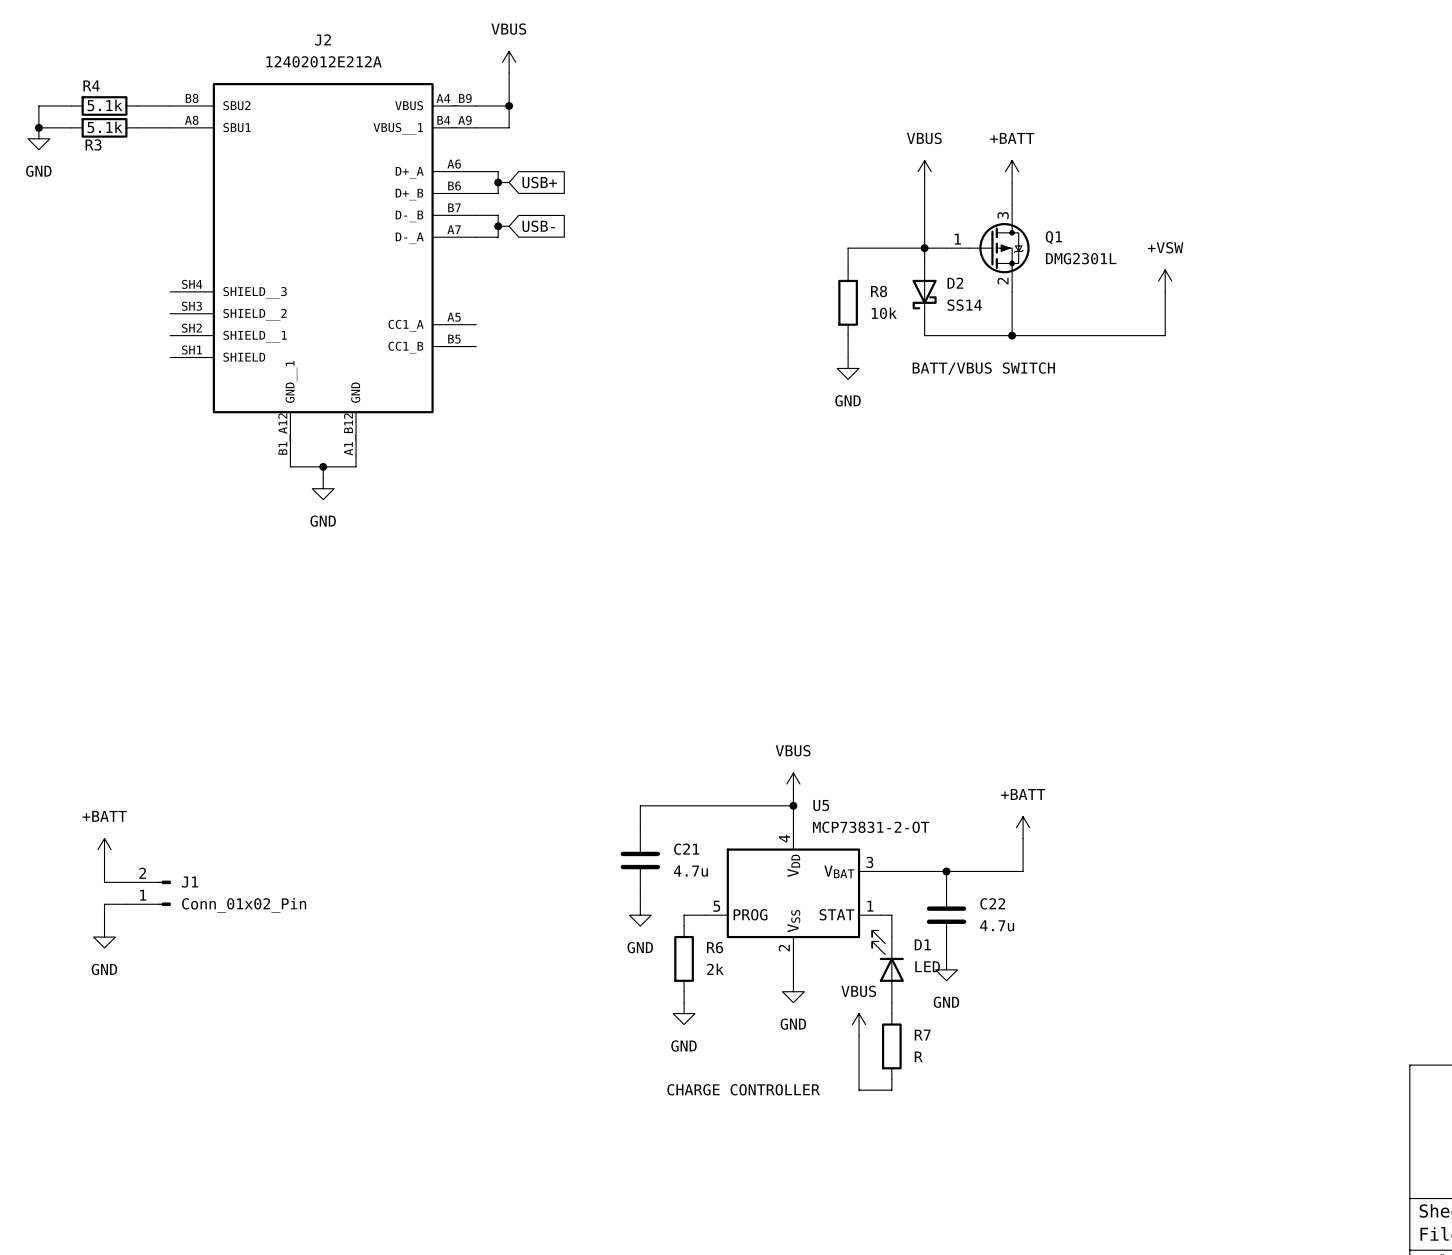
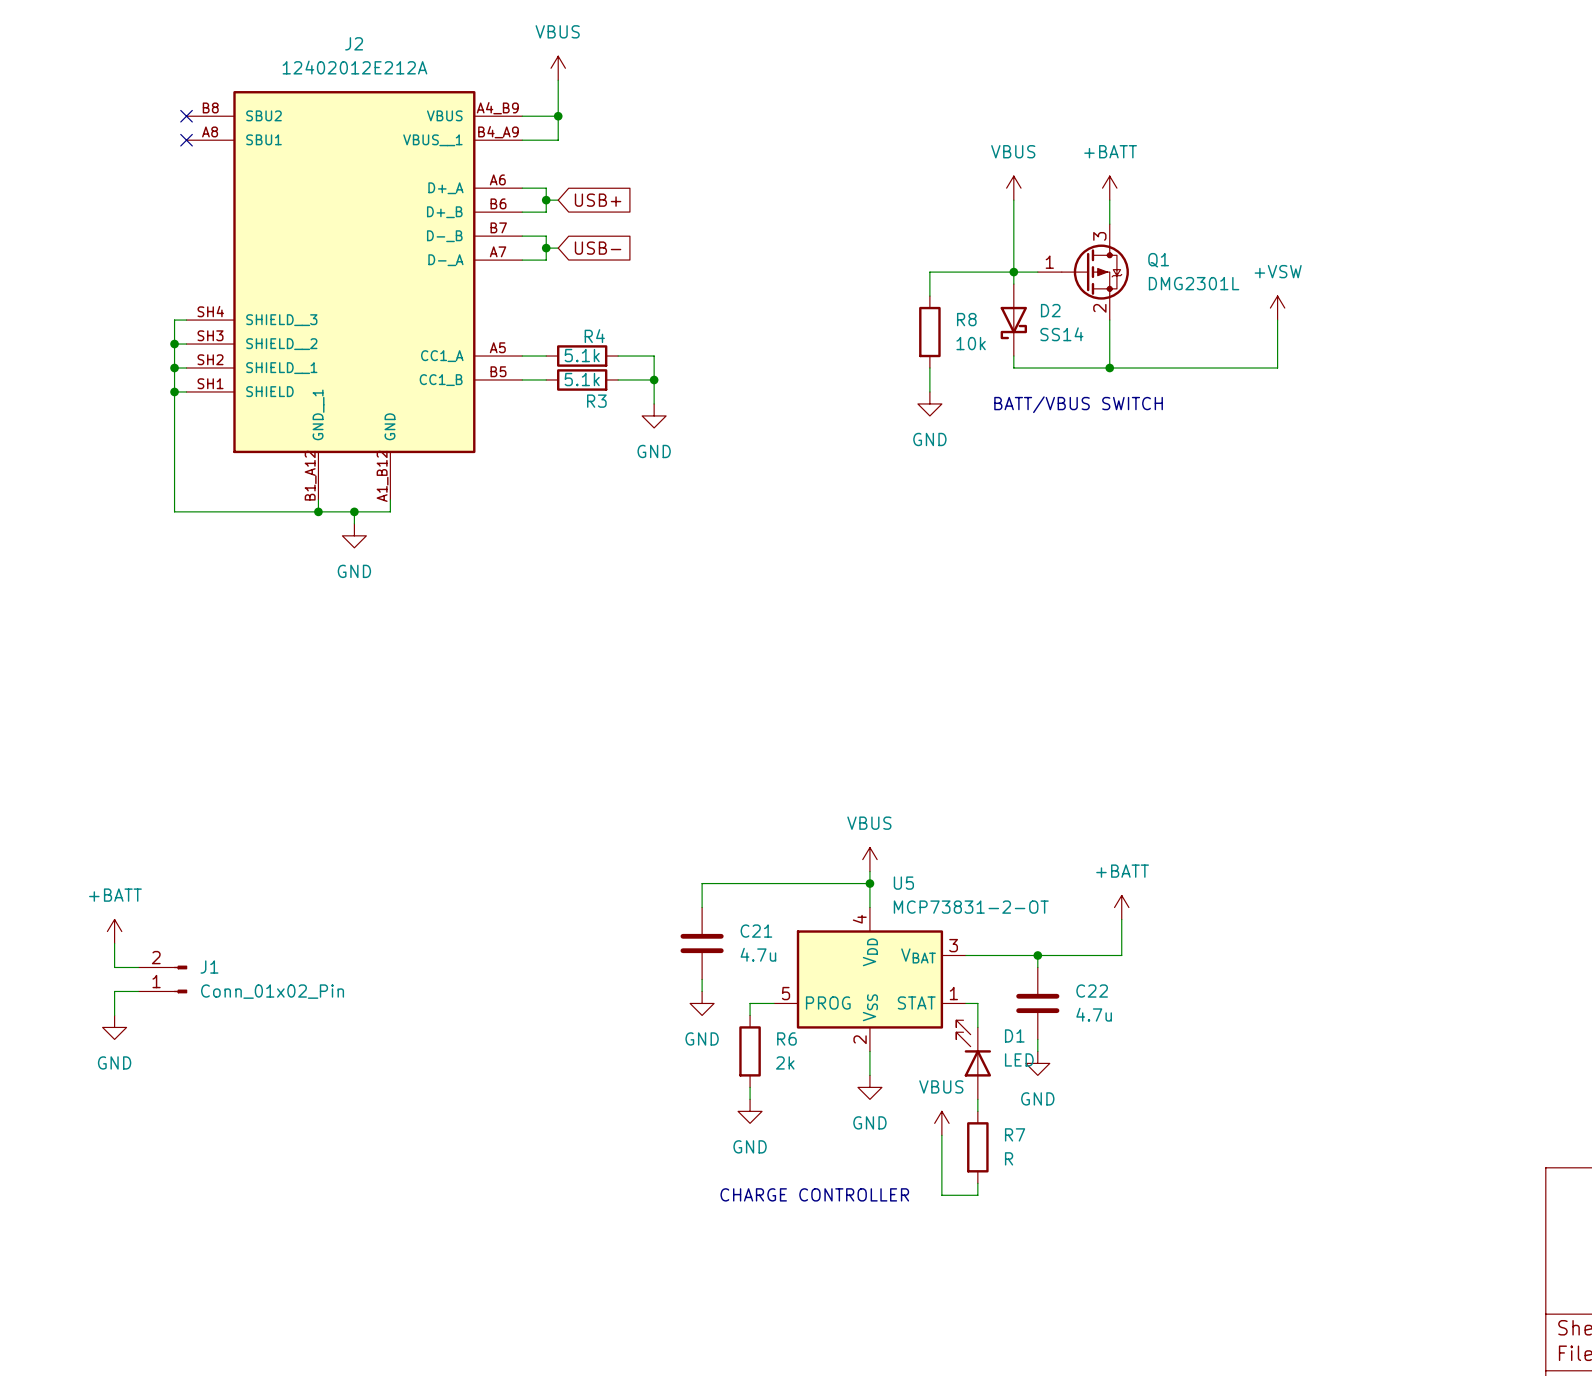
R4 name position: R4 (91, 85) -> R4 (594, 336)
wire: (71, 105) (38, 105) (38, 127) (71, 127) -> none
R4 position: (104, 105) -> (582, 356)
wire: (137, 105) (170, 105) -> none
no-connect mark: none -> (186, 116)
junction: (38, 127) -> none
R3 position: (104, 127) -> (582, 379)
wire: (137, 127) (170, 127) -> none
no-connect mark: none -> (186, 140)
power symbol: GND (38, 138) -> none
R3 name position: R3 (93, 144) -> R3 (596, 401)
wire: none -> (186, 320) (174, 320) (174, 511) (318, 511)
wire: none -> (174, 344) (186, 344)
junction: none -> (174, 344)
wire: none -> (522, 356) (546, 356)
wire: none -> (618, 356) (654, 356) (654, 403)
wire: none -> (174, 368) (186, 368)
junction: none -> (174, 368)
wire: none -> (522, 379) (546, 379)
wire: none -> (618, 379) (654, 379)
junction: none -> (654, 379)
wire: none -> (174, 391) (186, 391)
junction: none -> (174, 391)
power symbol: none -> GND (654, 415)
junction: none -> (318, 511)

